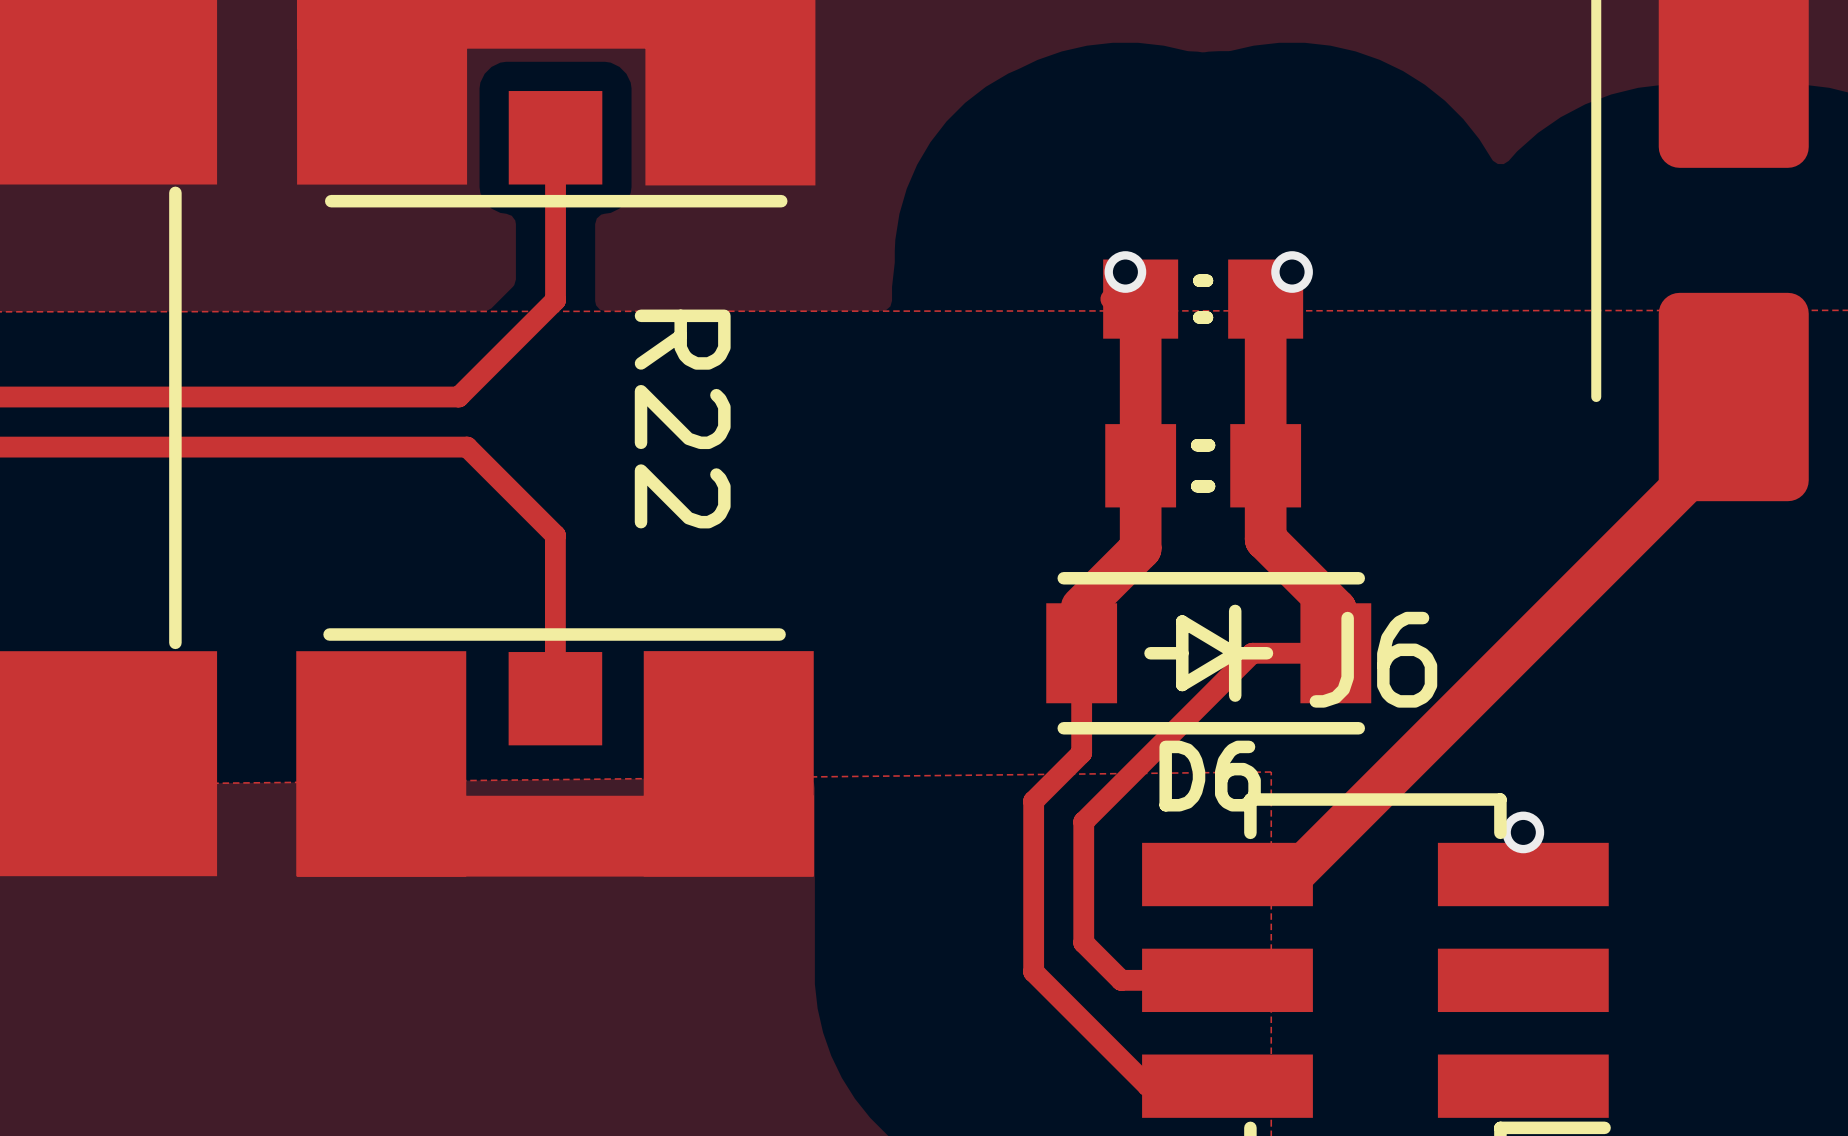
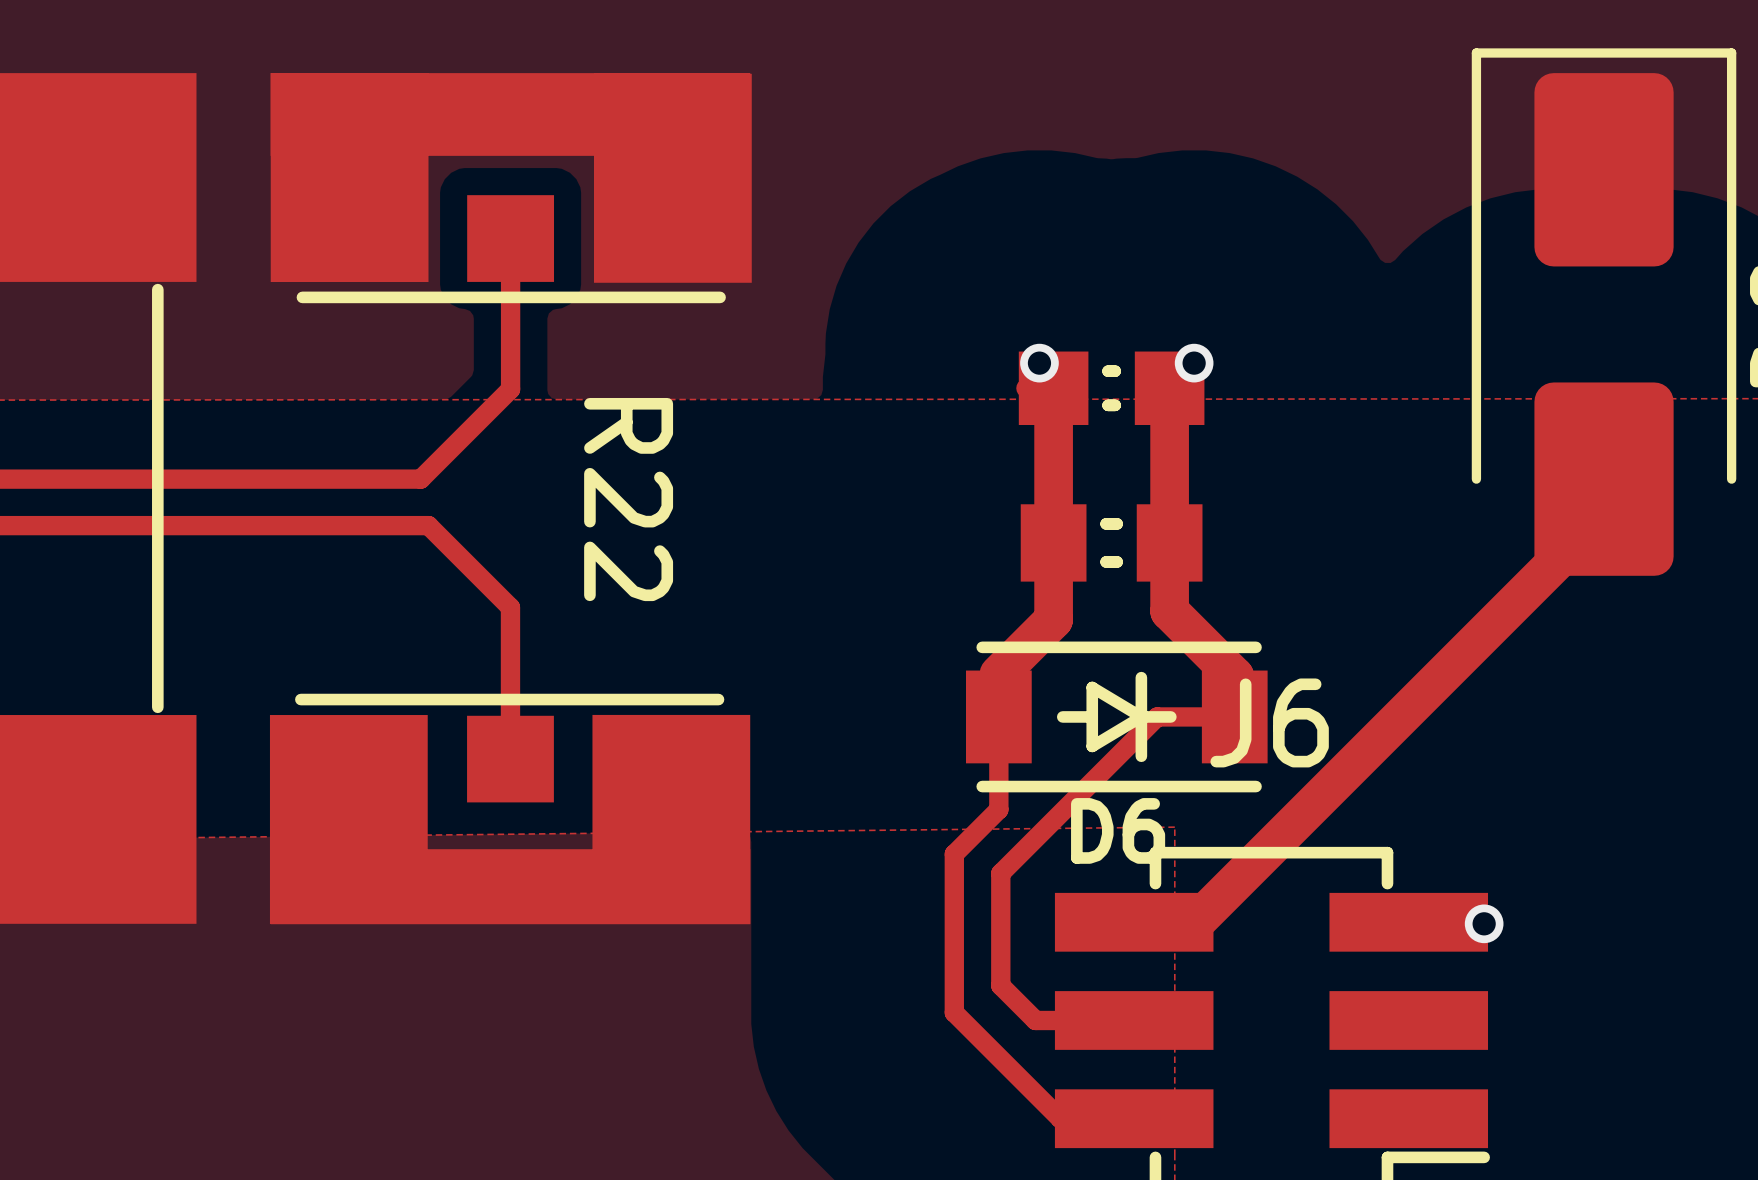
via position: (1523, 832) -> (1484, 923)

